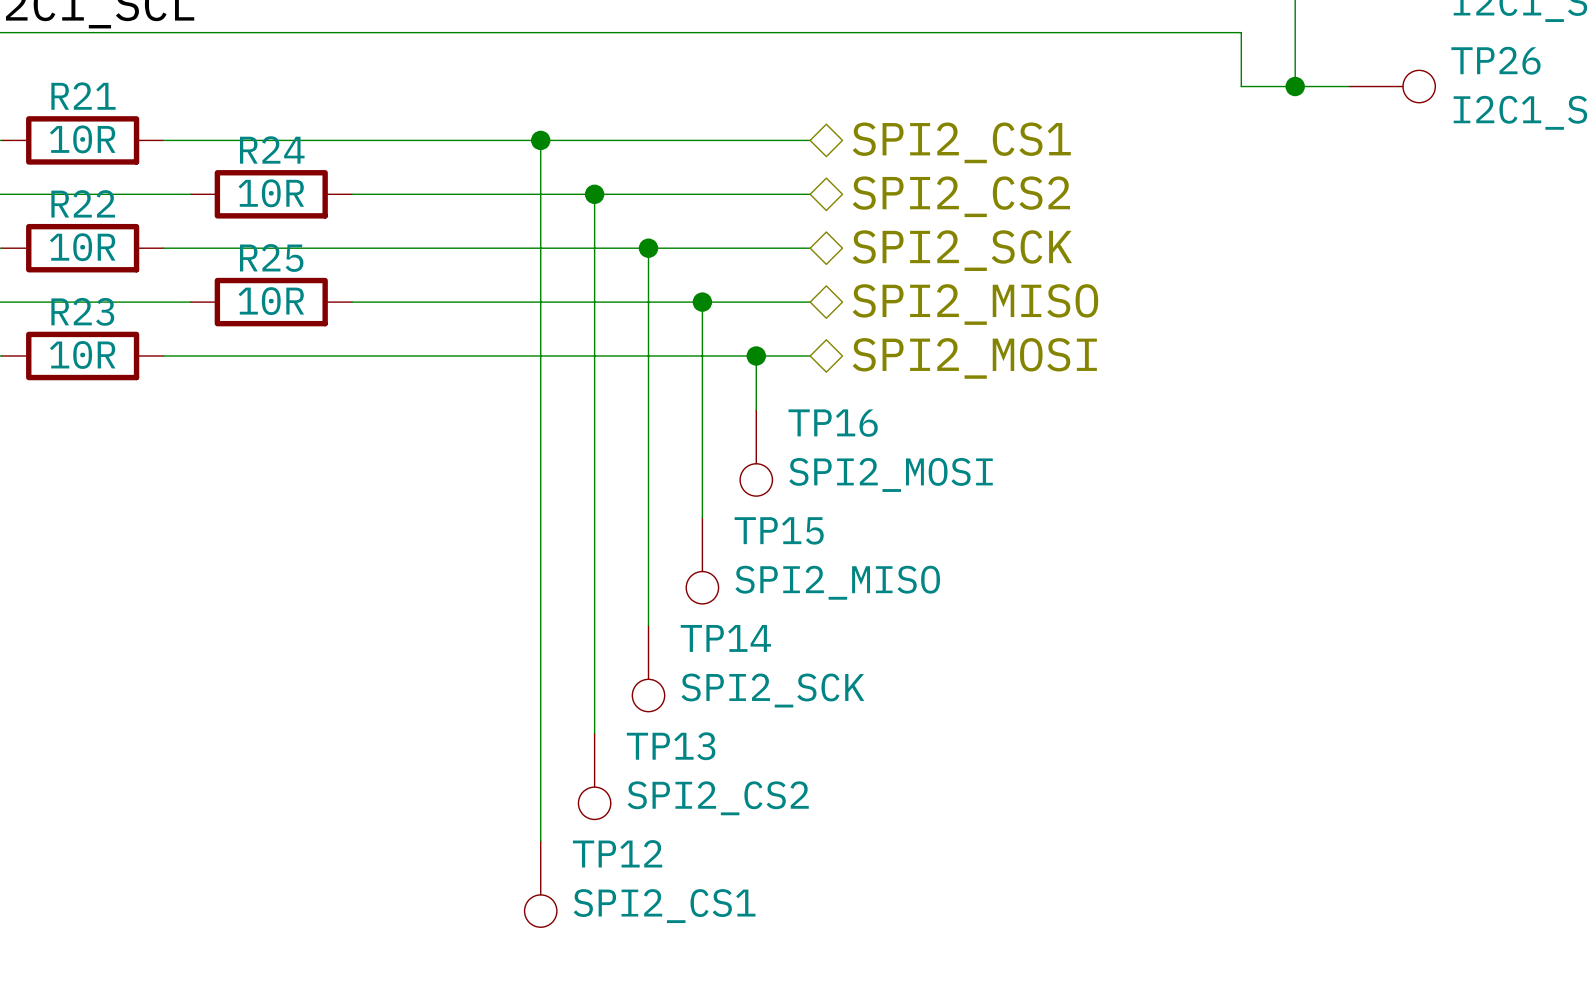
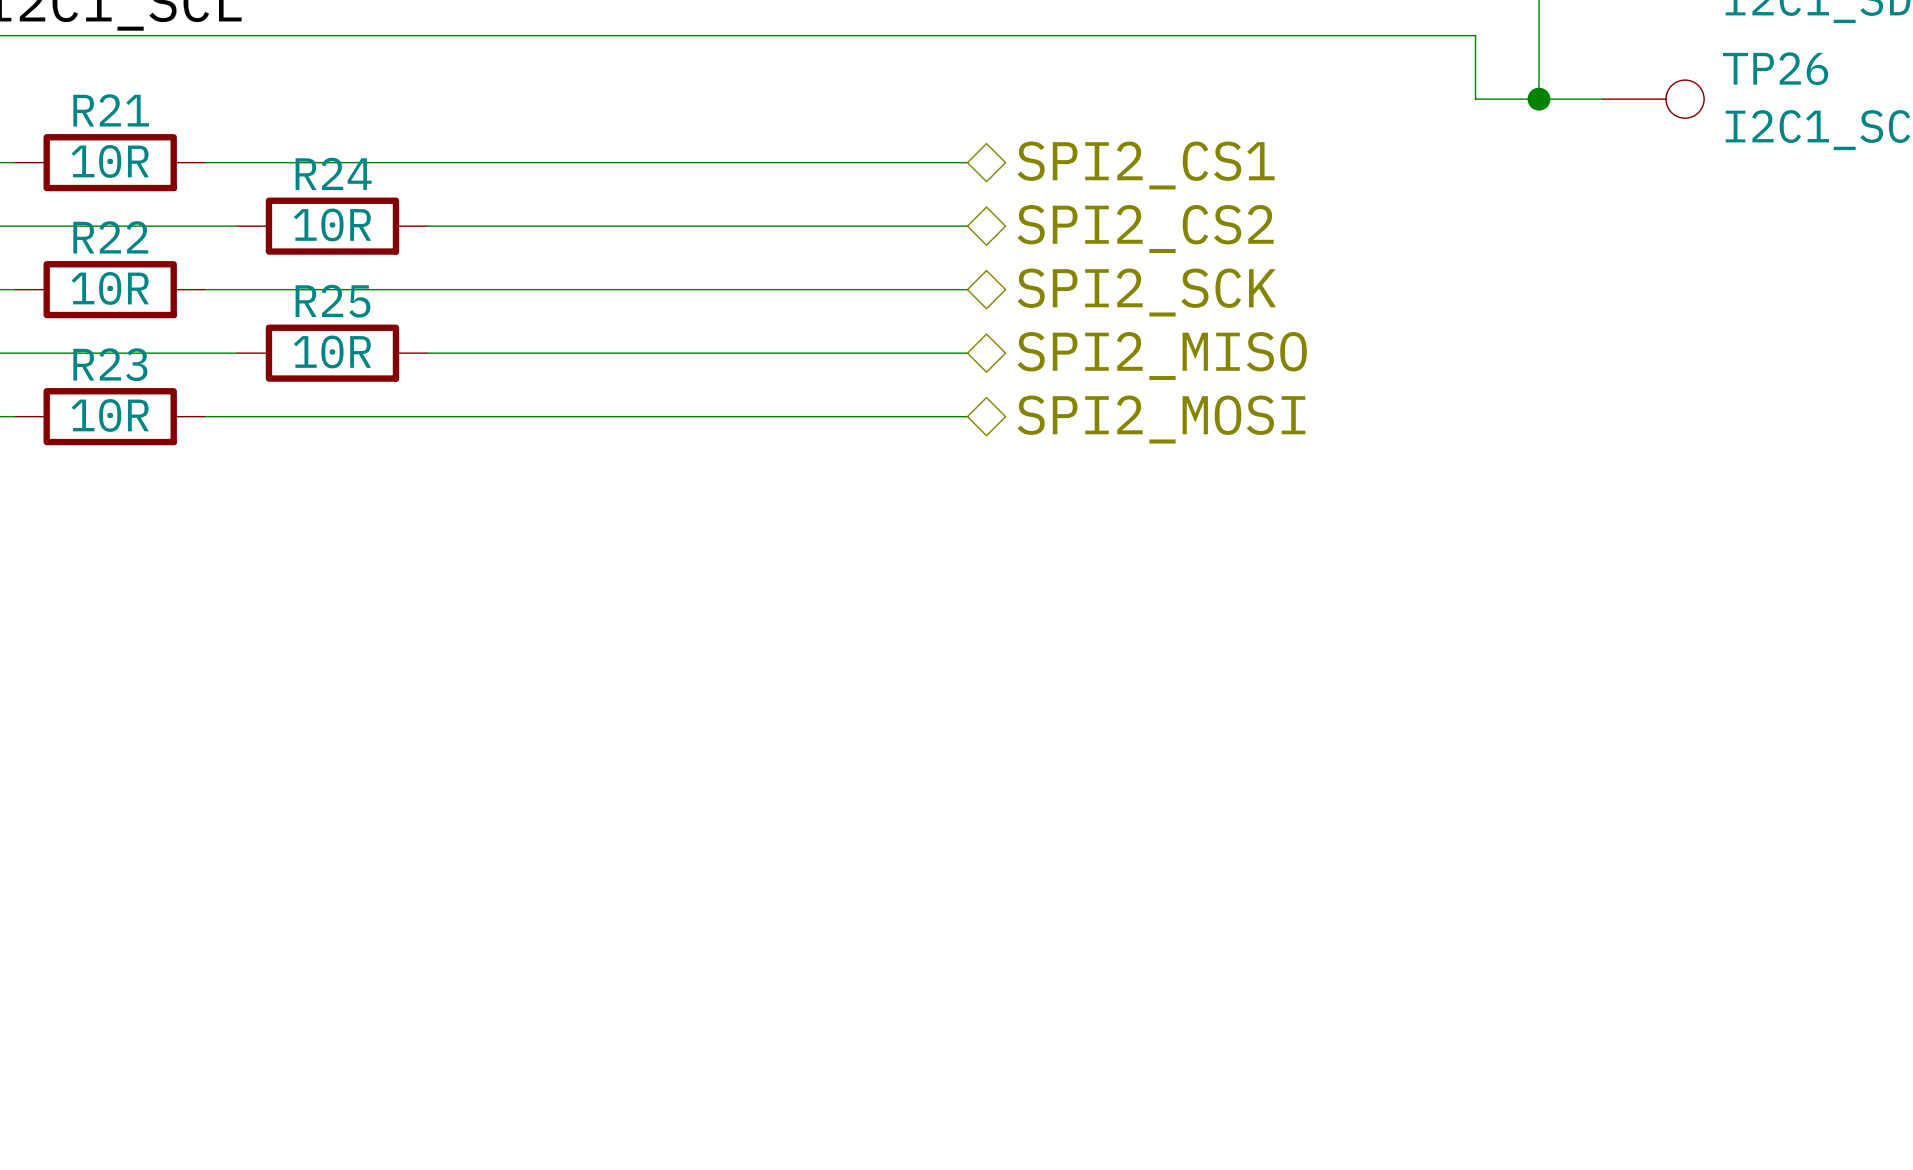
wire: (540, 140) (540, 841) -> none
junction: (540, 140) -> none
wire: (594, 194) (594, 733) -> none
junction: (594, 194) -> none
wire: (648, 248) (648, 625) -> none
junction: (648, 248) -> none
wire: (702, 302) (702, 517) -> none
junction: (702, 302) -> none
wire: (756, 355) (756, 409) -> none
junction: (756, 355) -> none
TP16: SPI2_MOSI (756, 452) -> none
TP15: SPI2_MISO (702, 560) -> none
TP14: SPI2_SCK (648, 668) -> none
TP13: SPI2_CS2 (594, 776) -> none
TP12: SPI2_CS1 (540, 884) -> none

